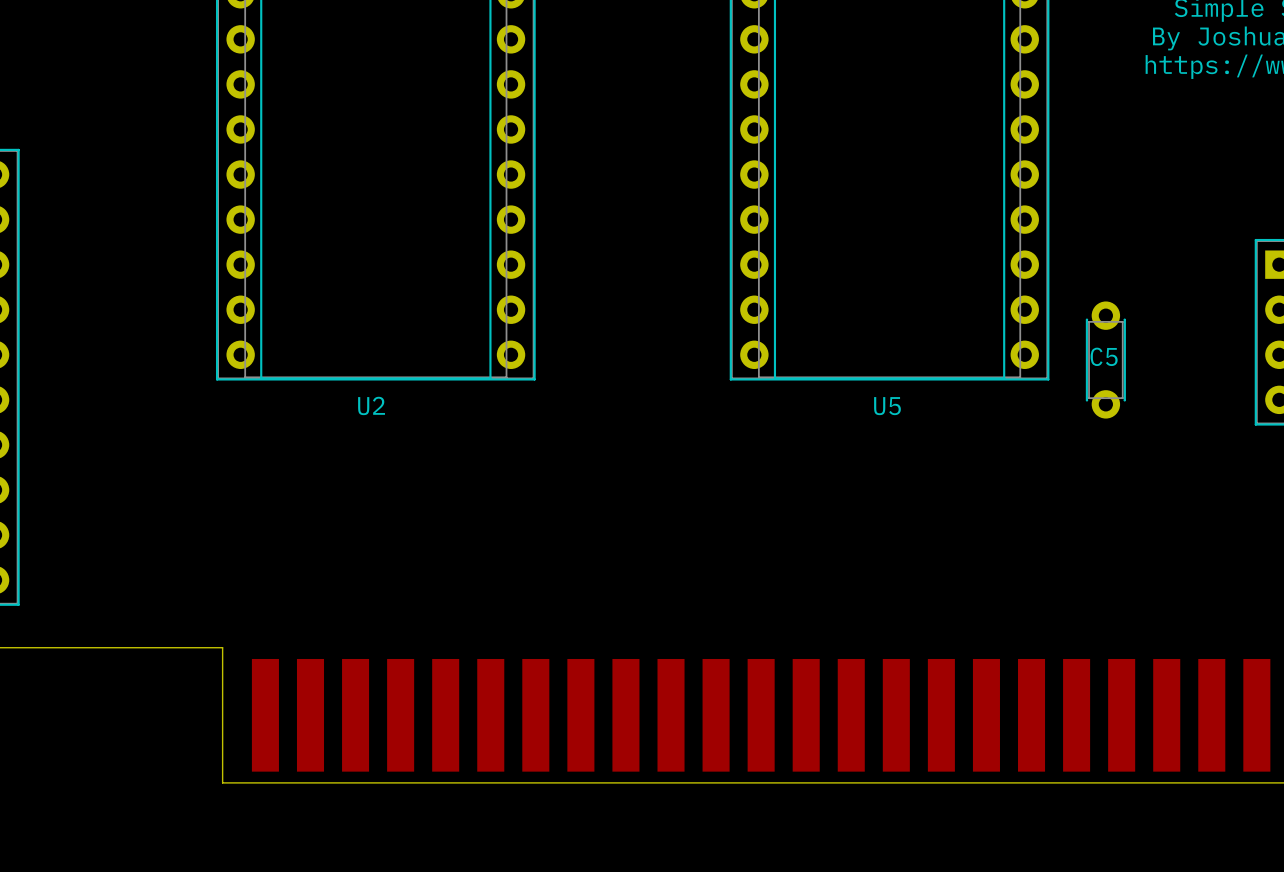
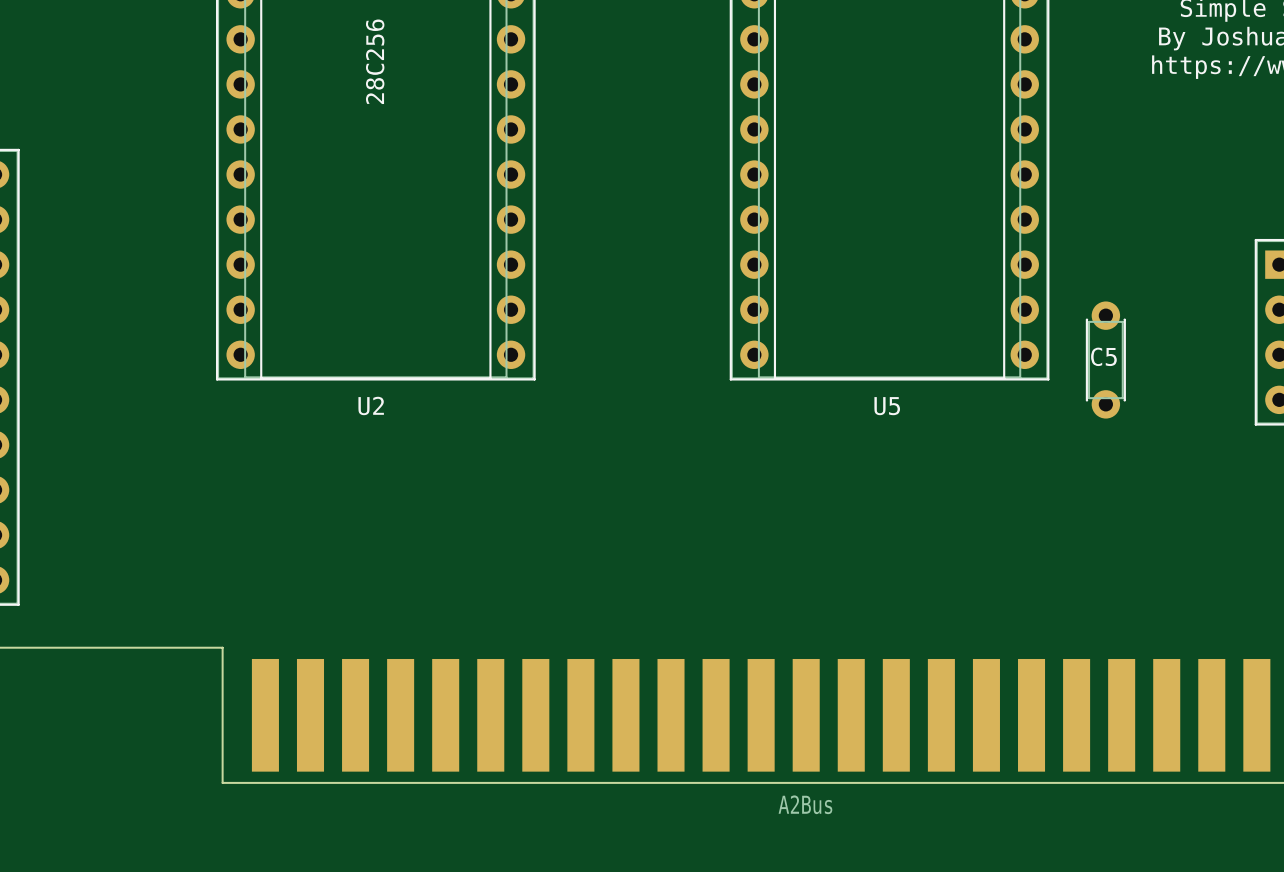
U2 value: none -> 28C256 (375, 61)
part value: none -> A2Bus (805, 804)

